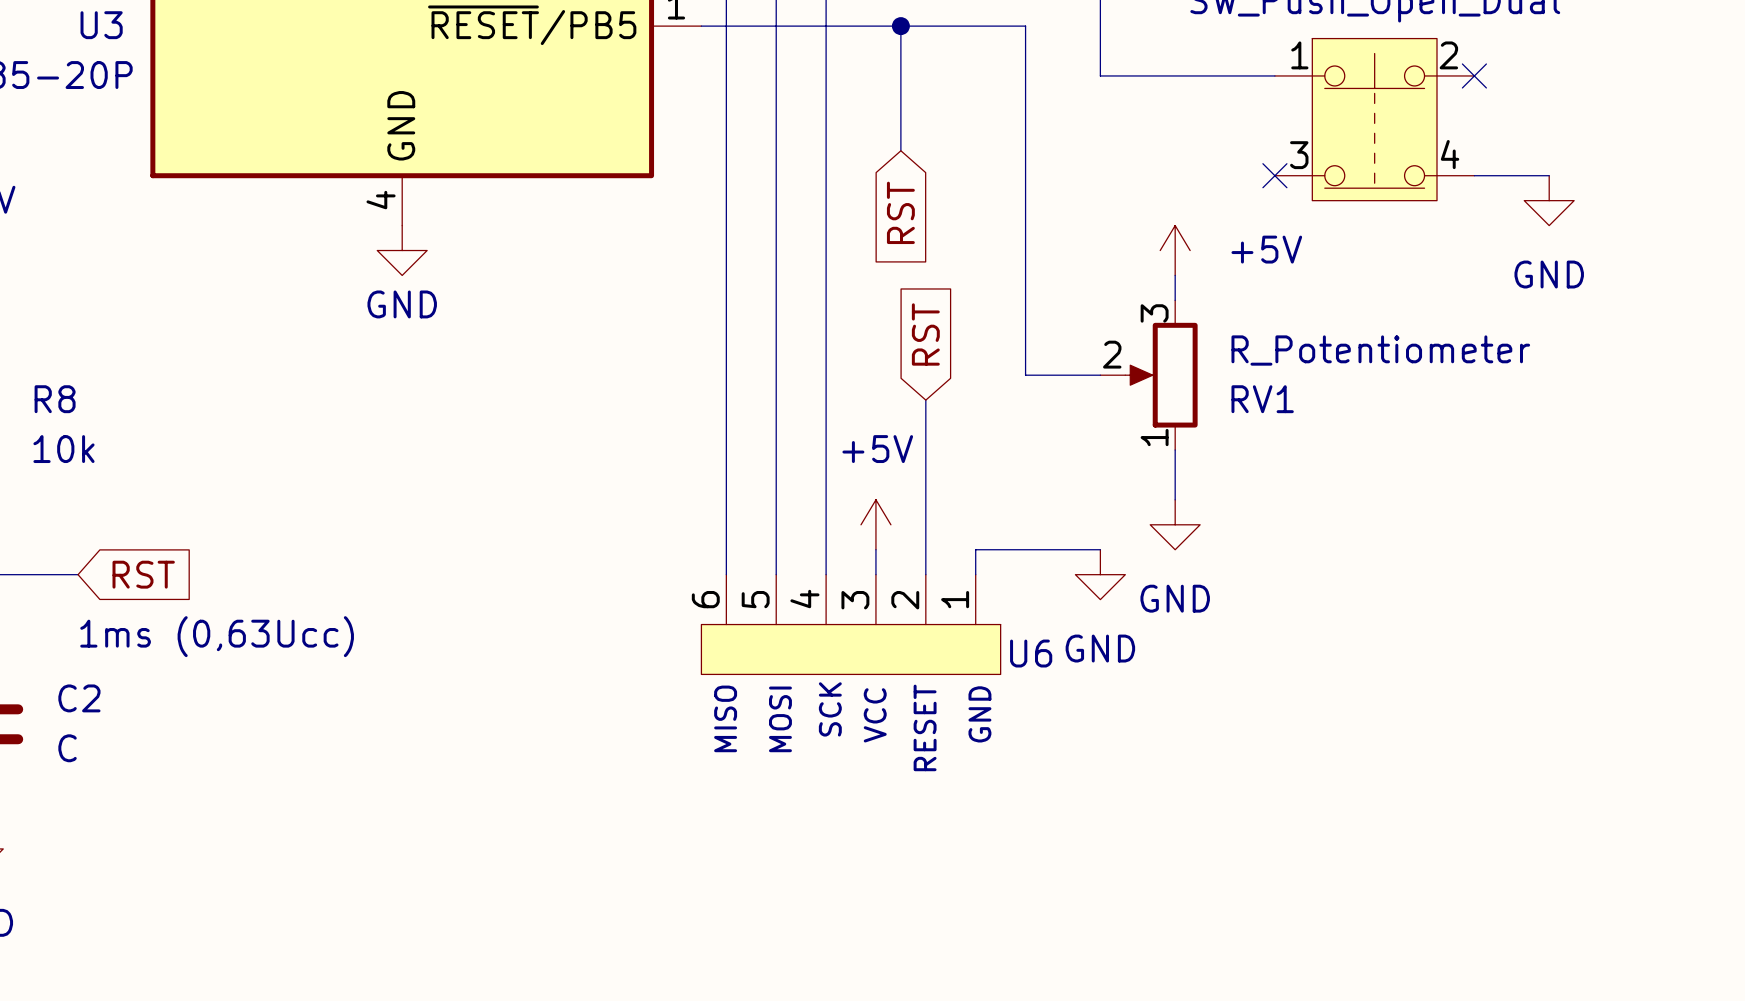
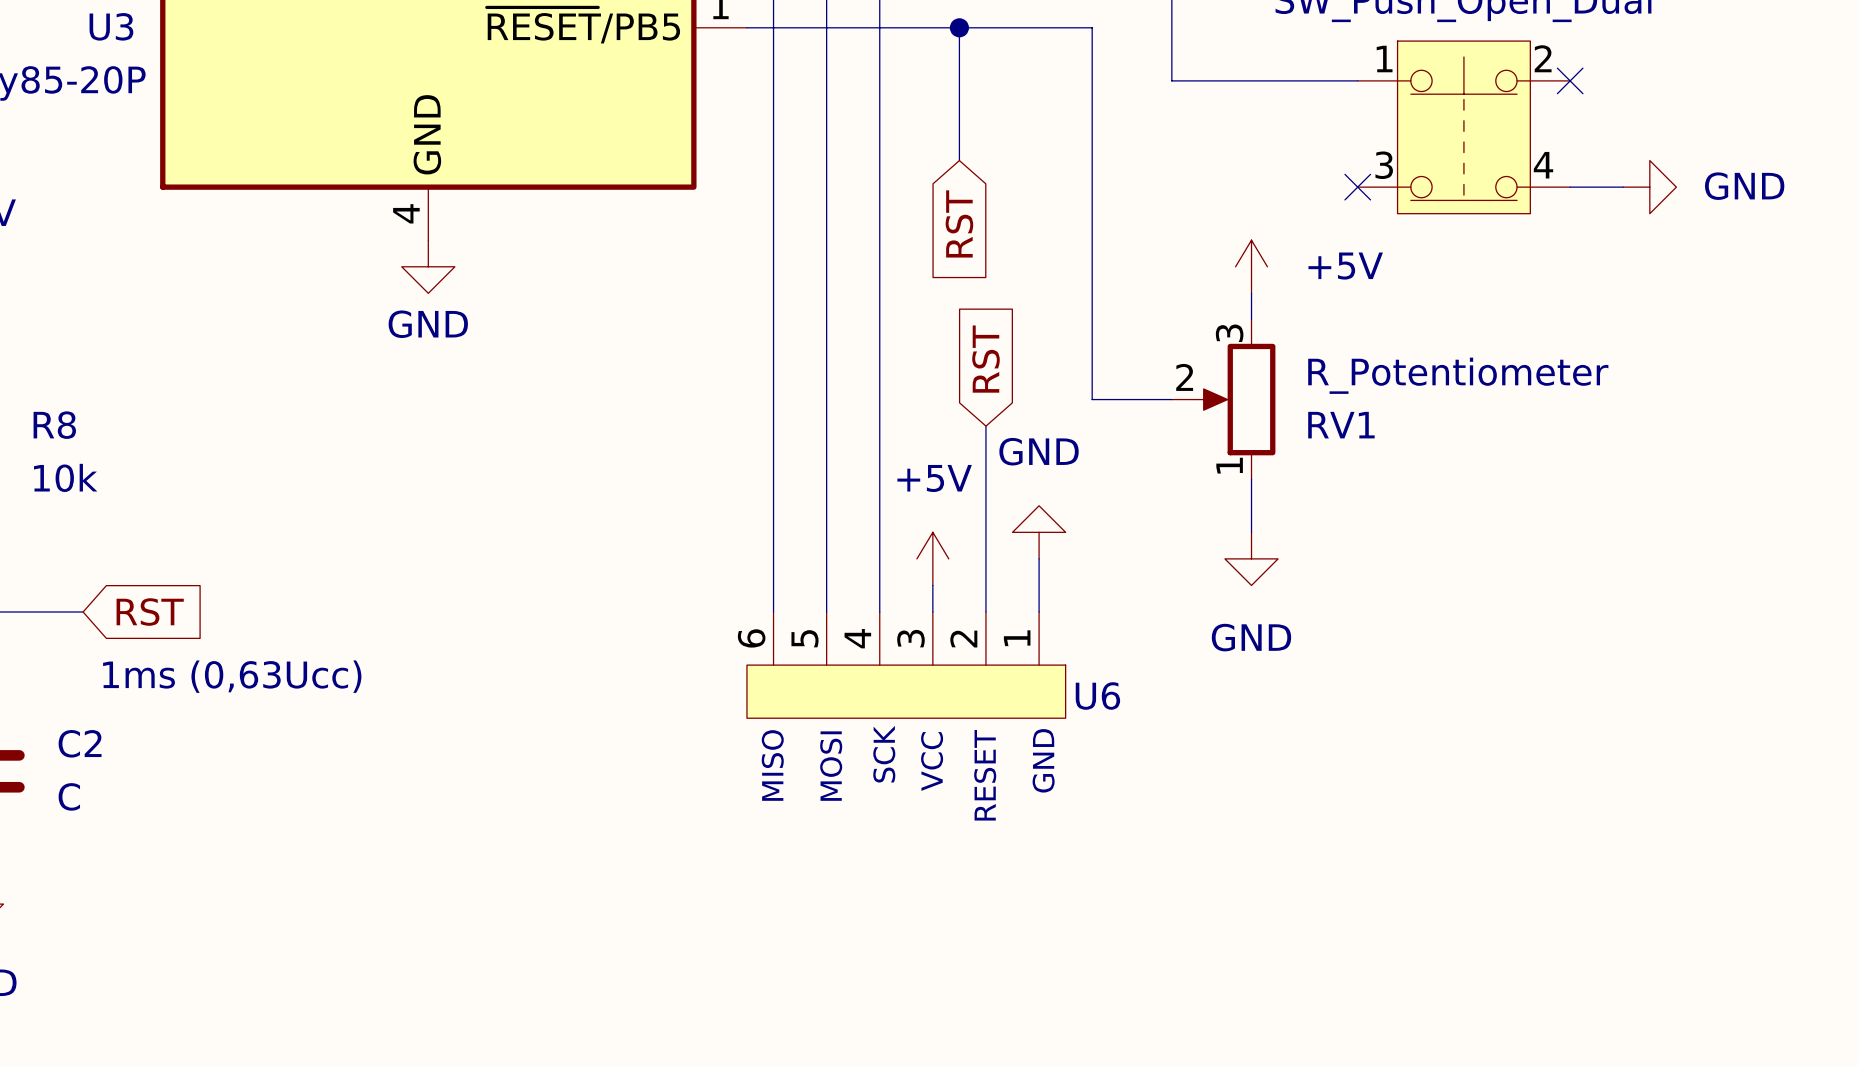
power symbol rotation: 0° (1549, 200) -> 90° counterclockwise (1649, 187)
wire: (975, 549) (1100, 549) -> (1039, 585) (1039, 558)
power symbol rotation: 0° (1100, 574) -> 180° (1039, 532)
power symbol position: GND (1100, 574) -> GND (1039, 532)

